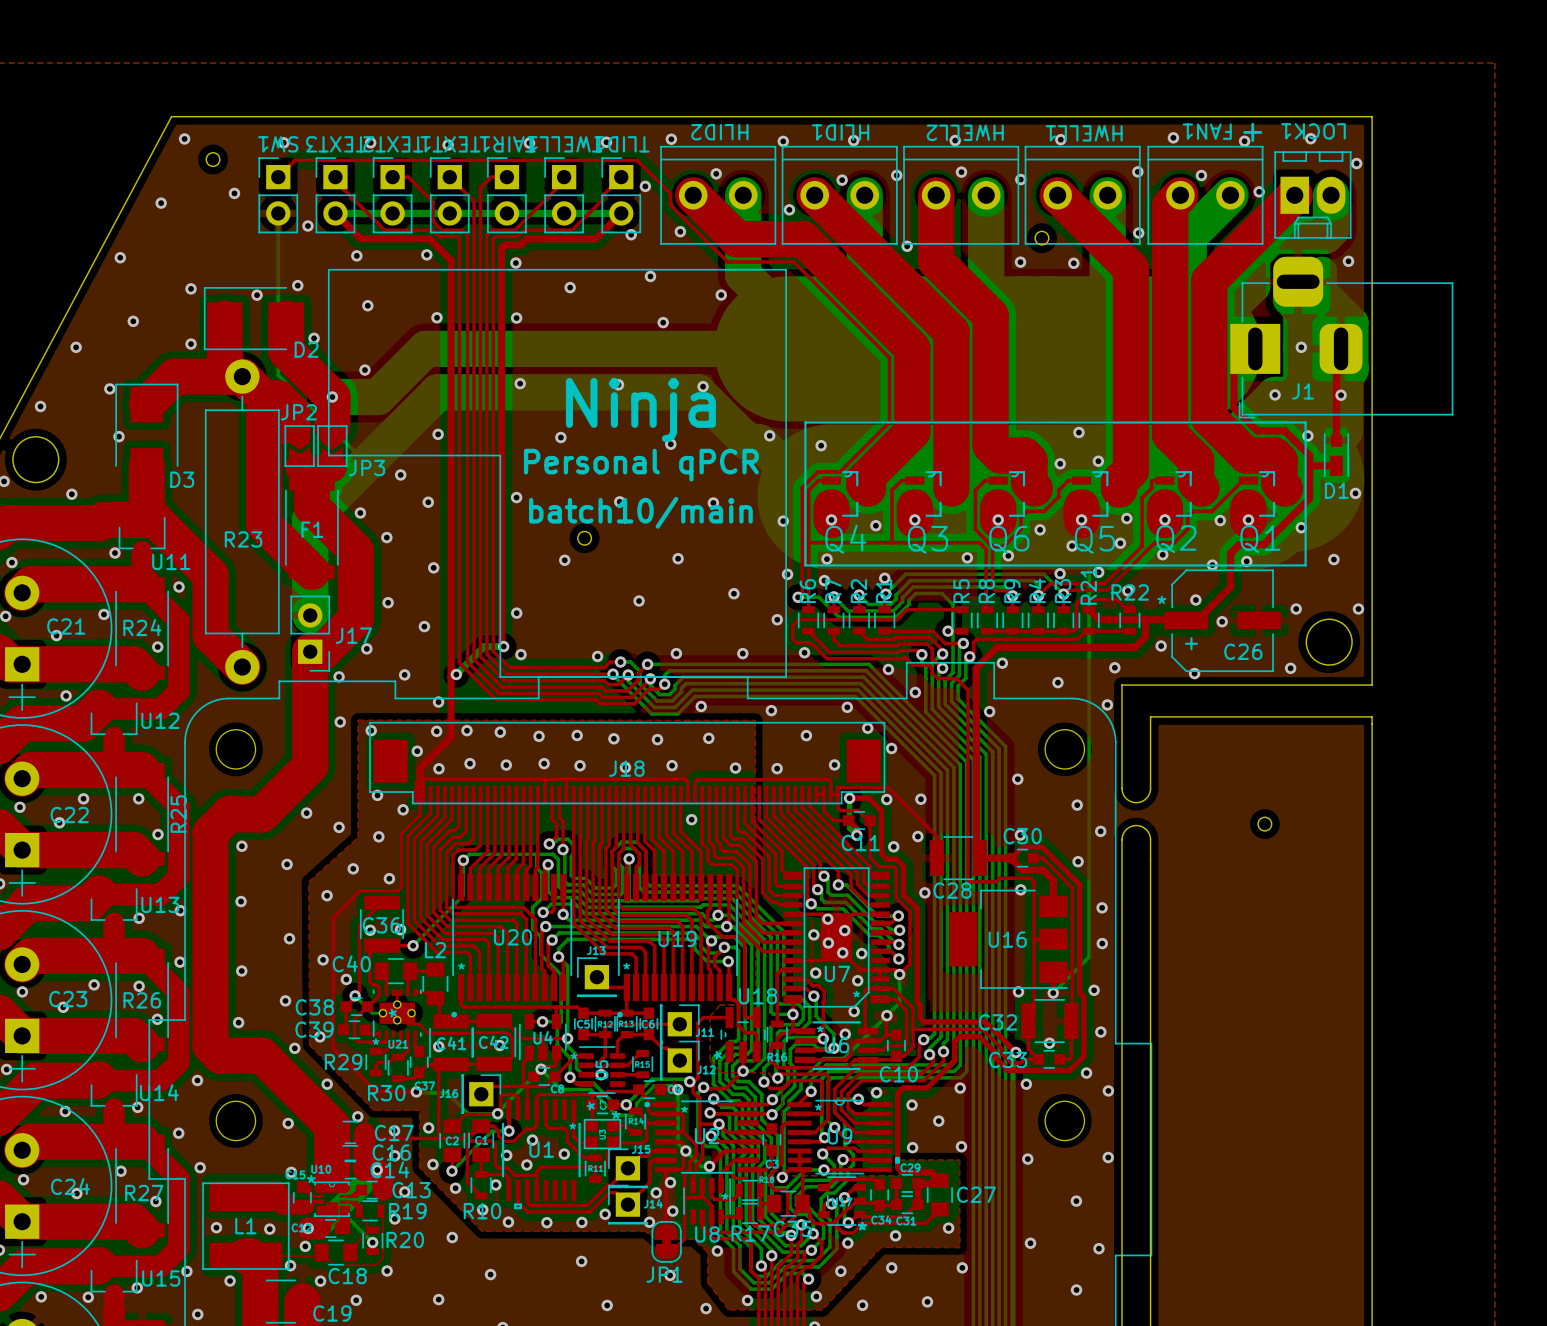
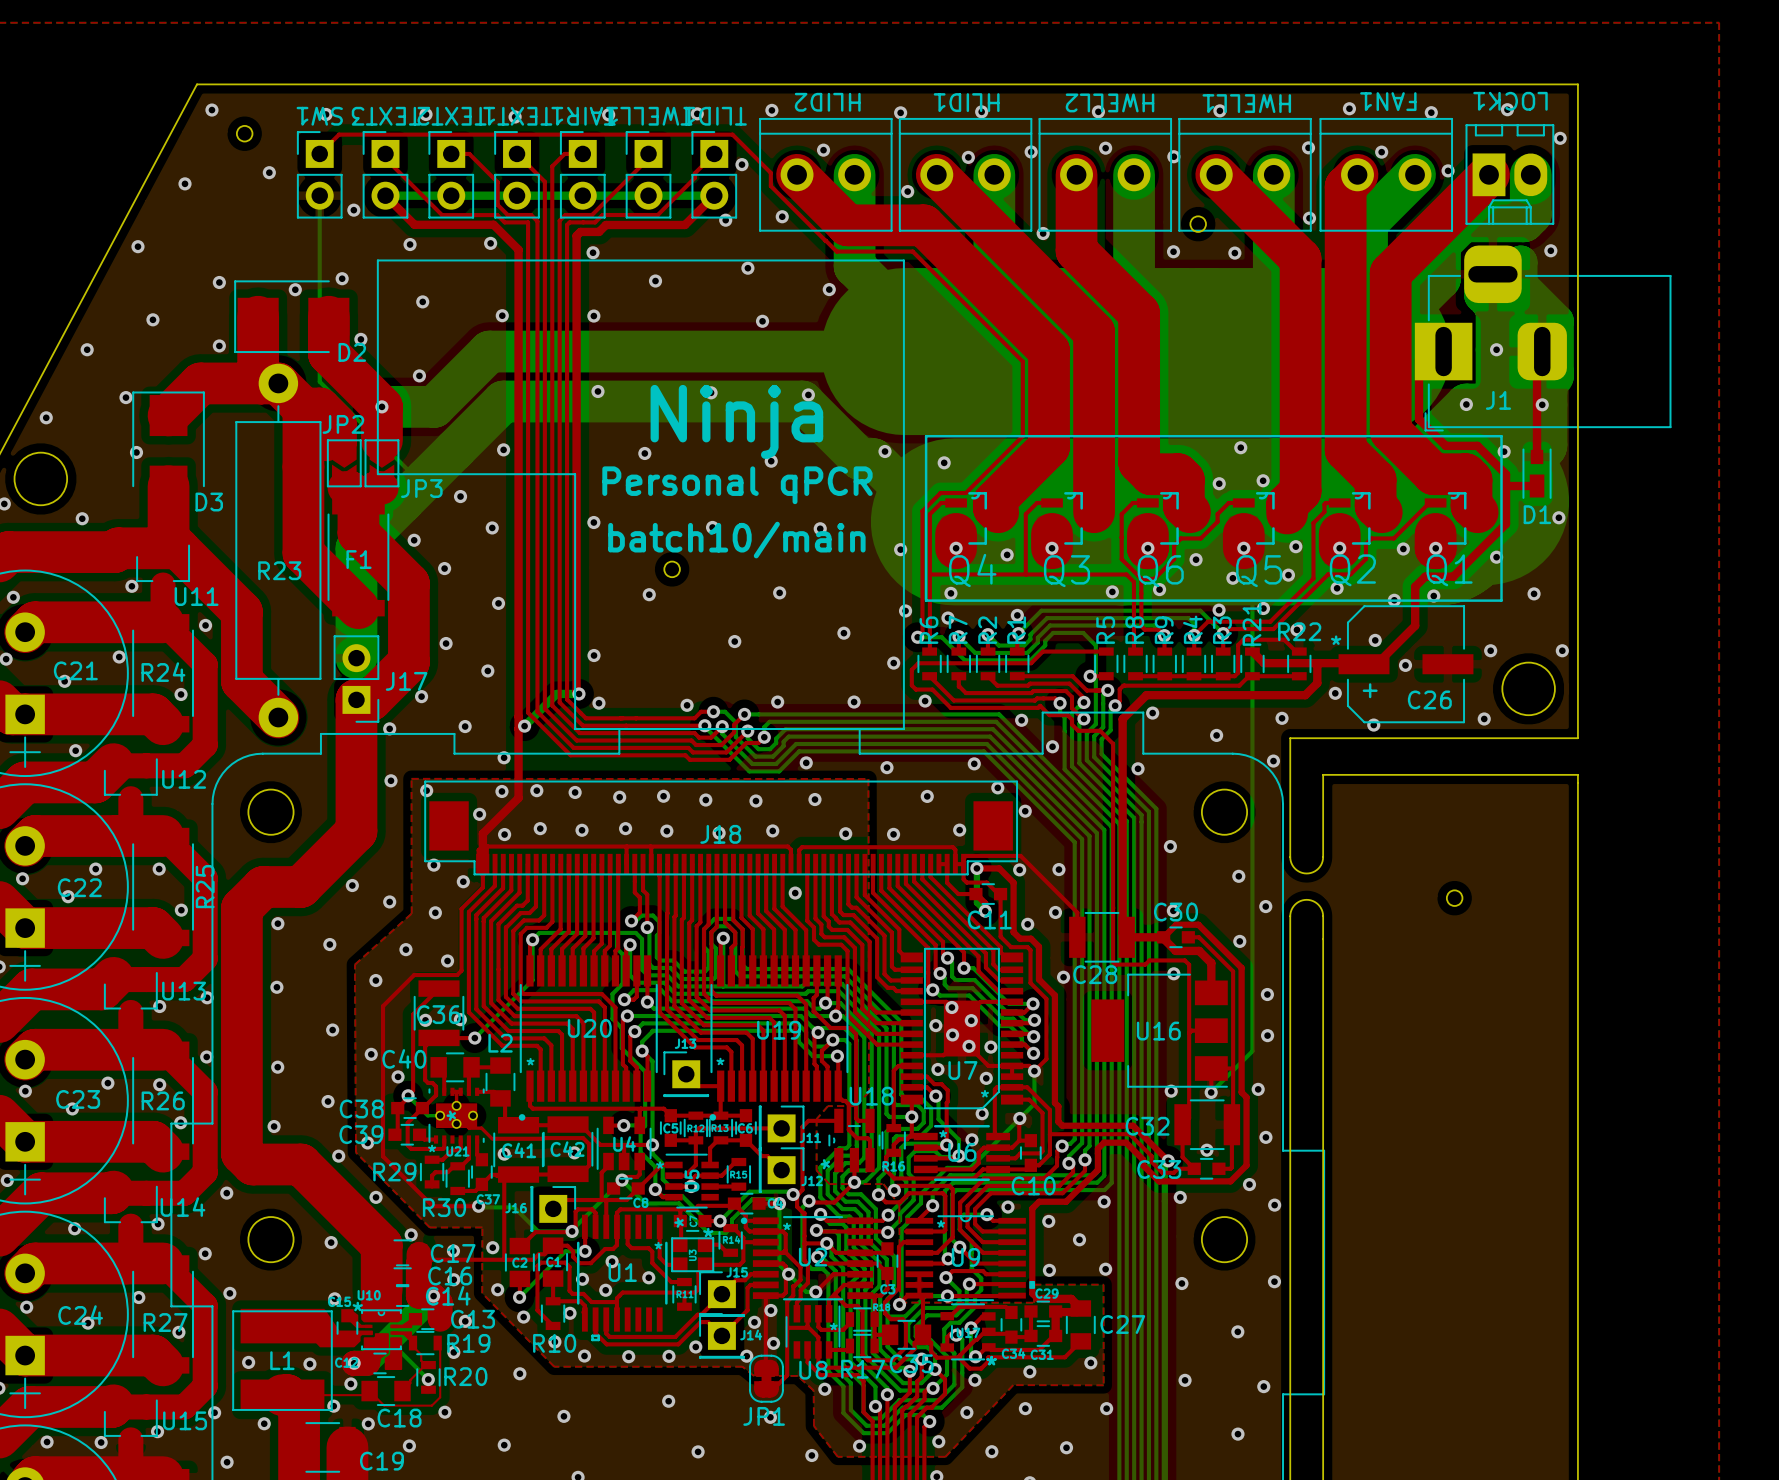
text: + (1252, 132) -> none

